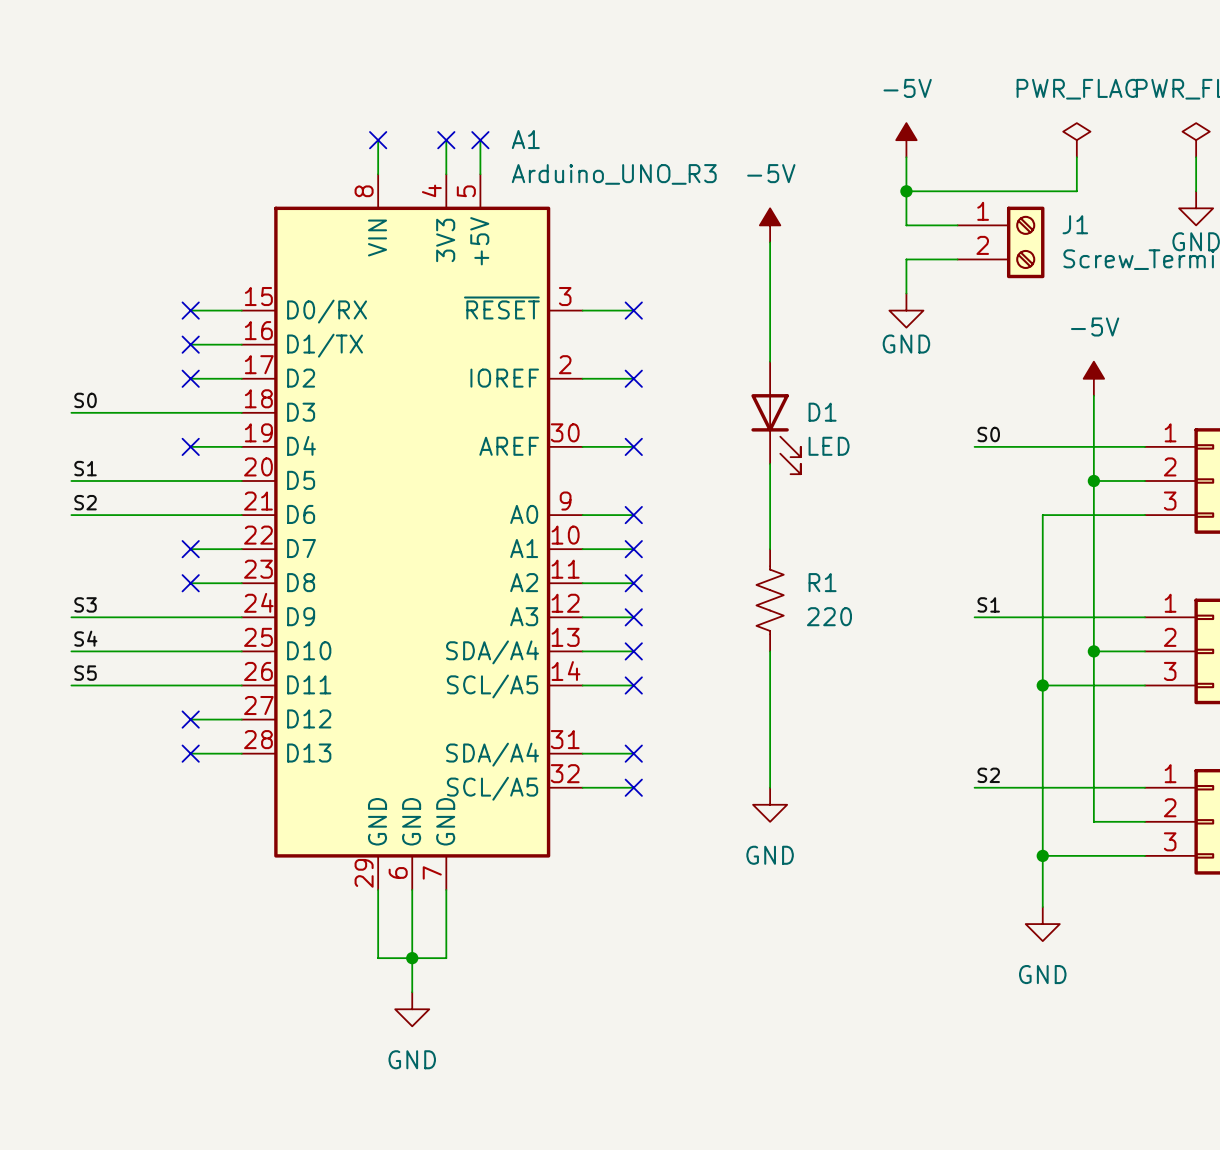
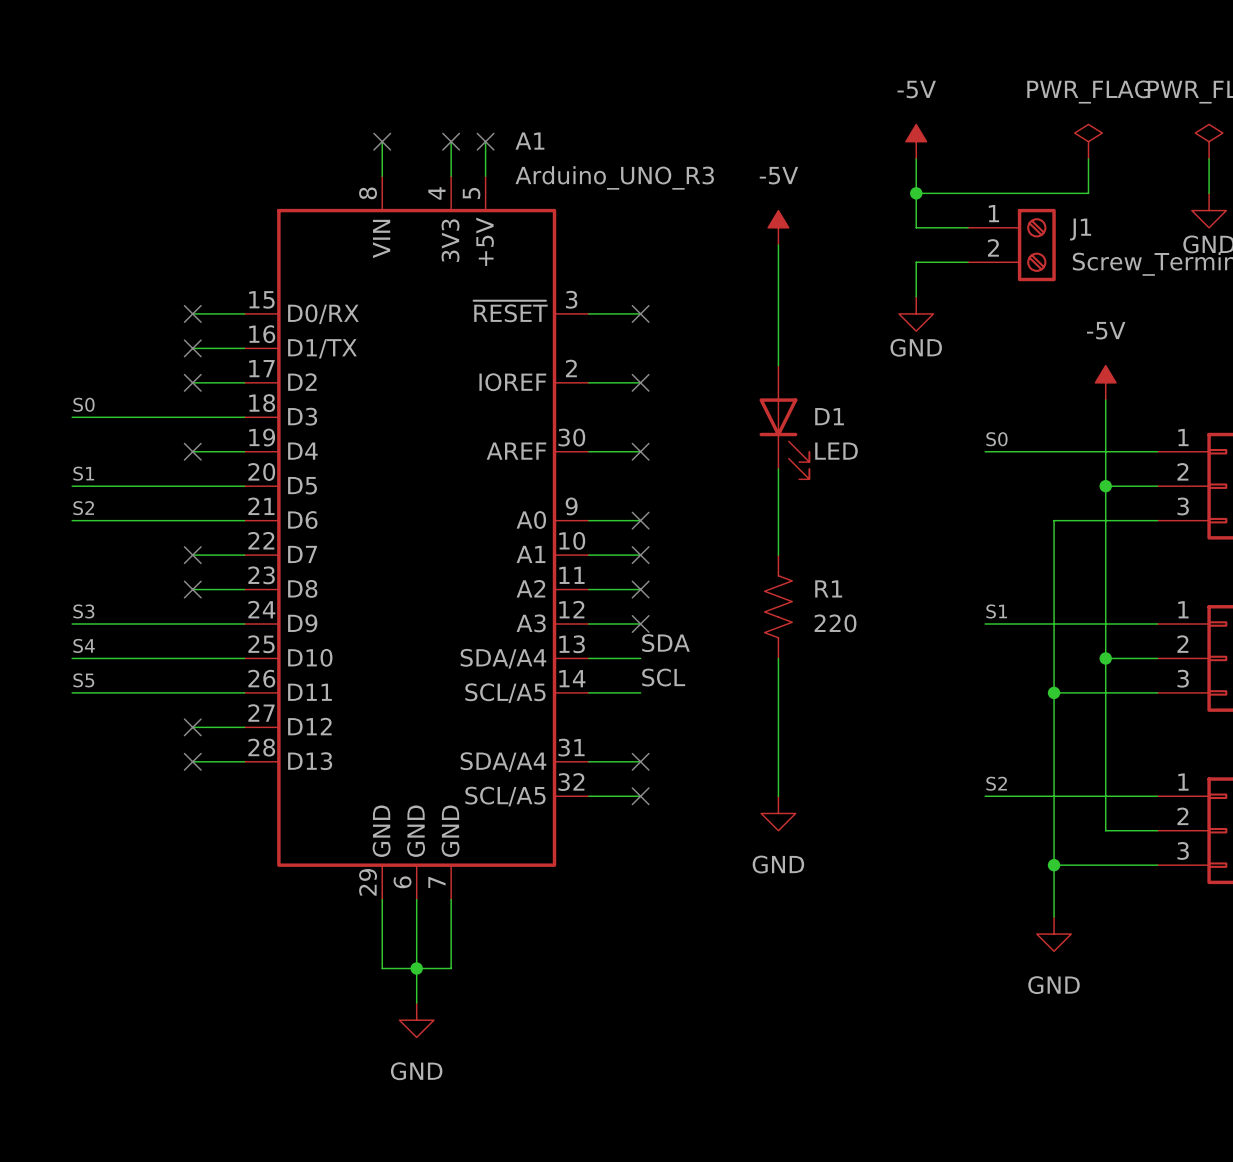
label: none -> SDA (665, 643)
no-connect mark: (633, 651) -> none
label: none -> SCL (663, 677)
no-connect mark: (633, 685) -> none

